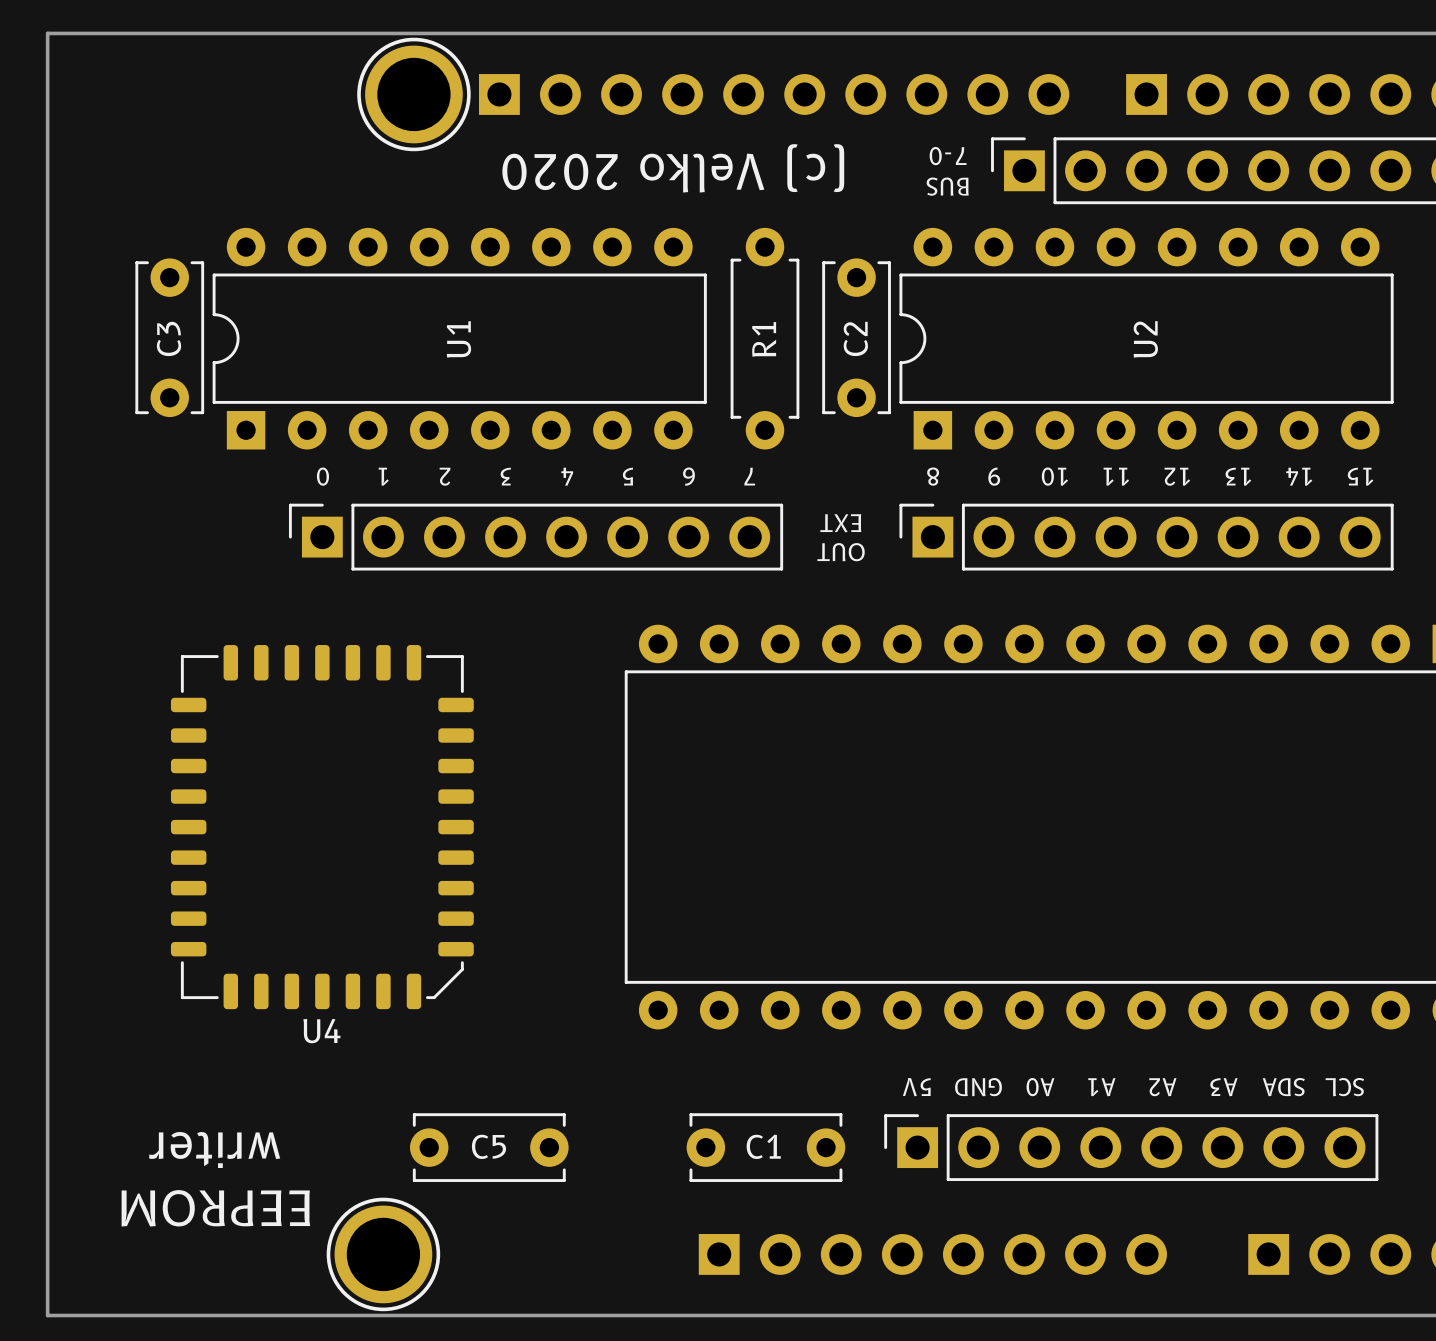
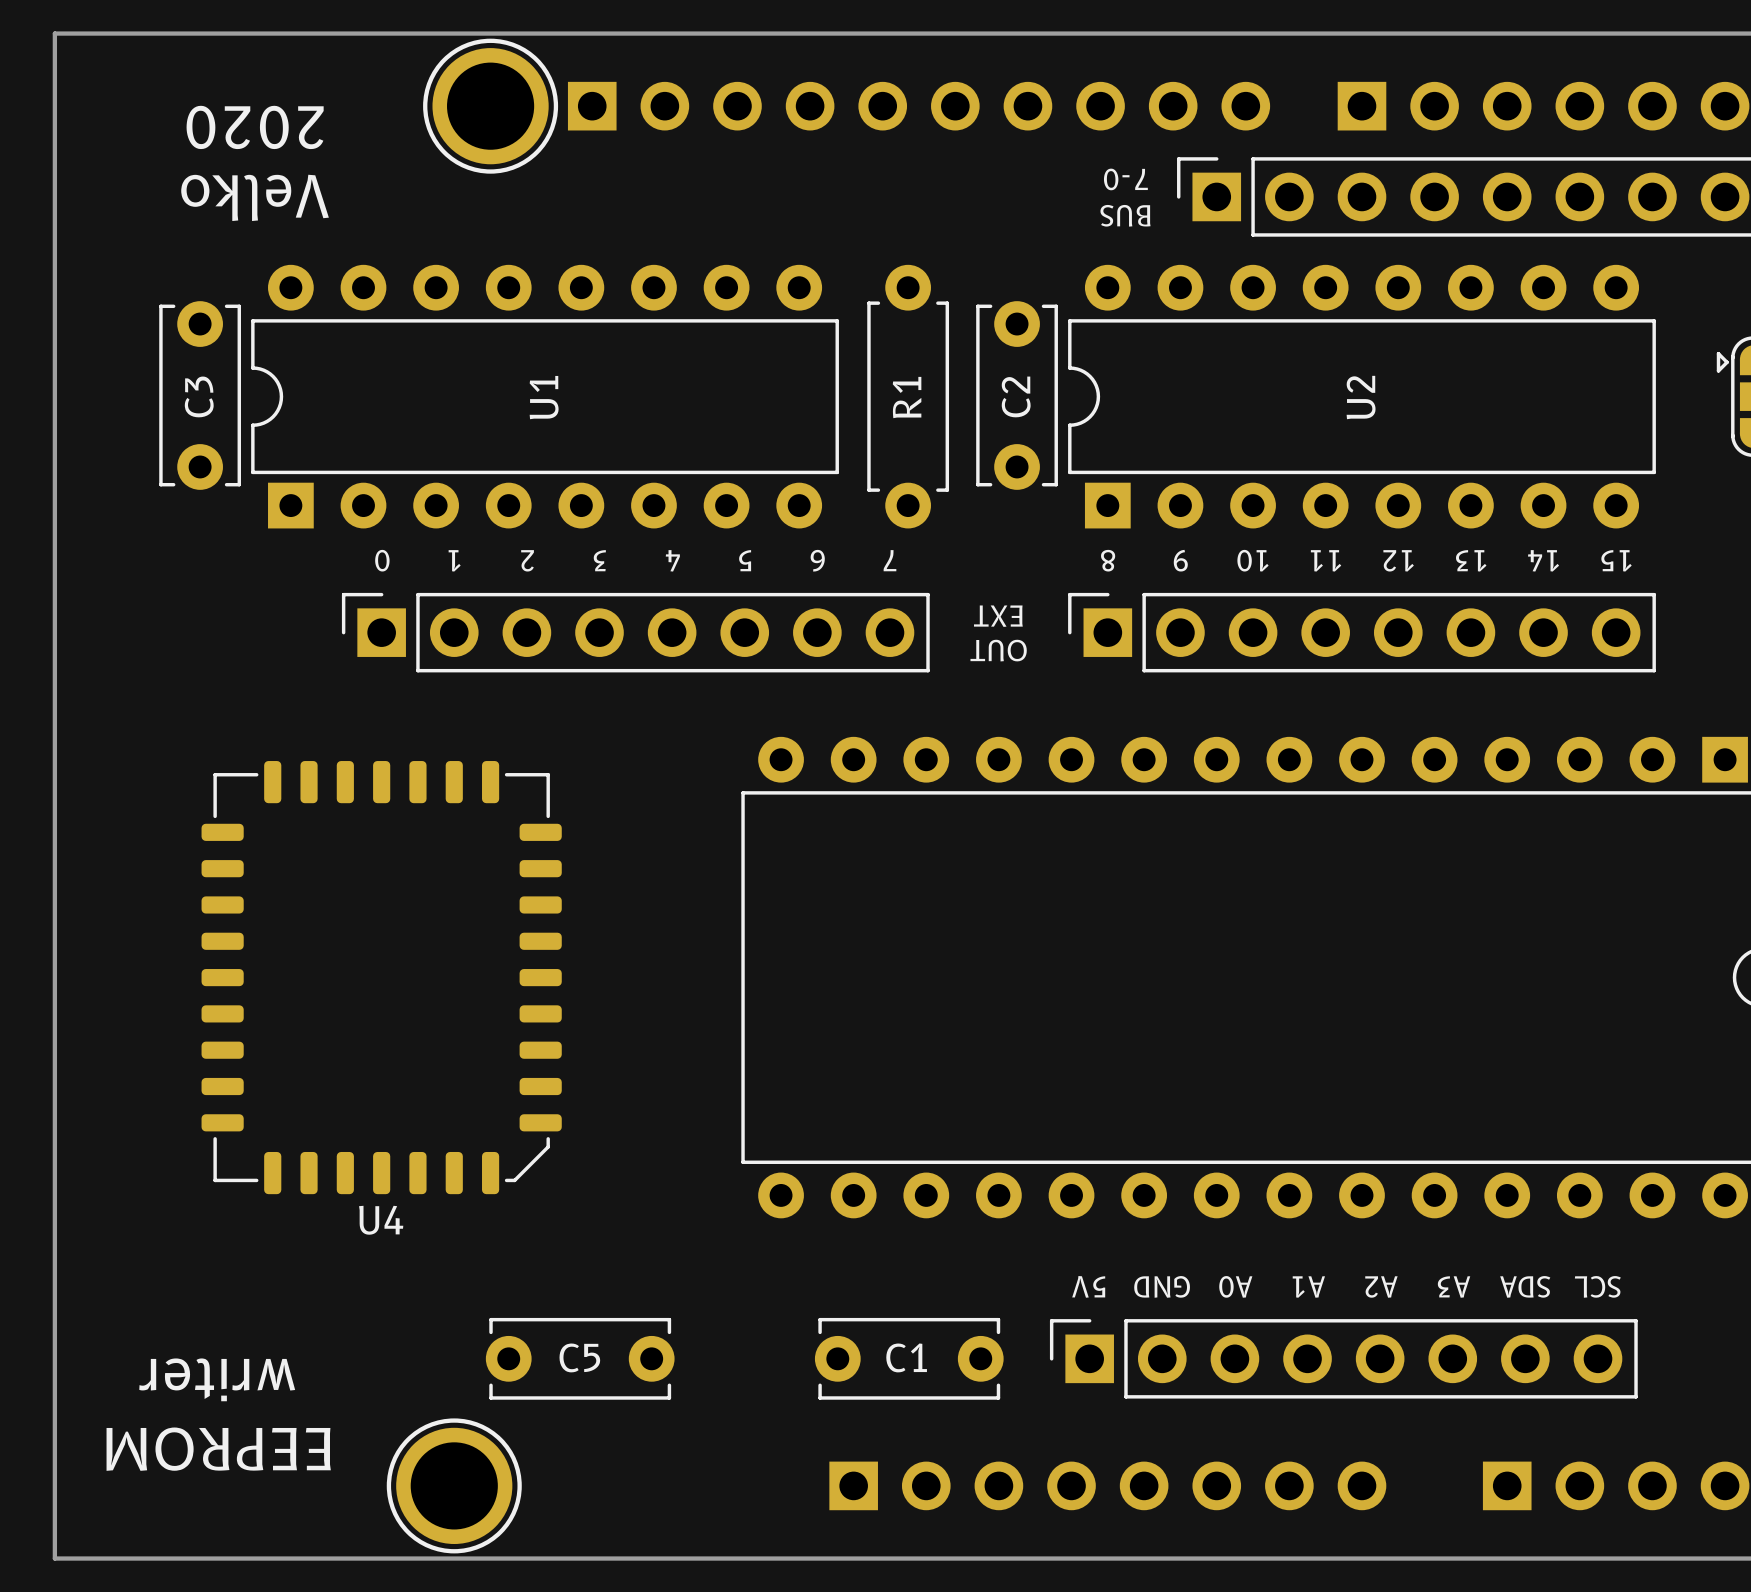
text: none -> 2020 (255, 127)
text: (c) Velko 2020 (673, 168) -> none
text: none -> Velko (255, 197)
text position: writer (214, 1150) -> writer (217, 1379)
text position: EEPROM (215, 1208) -> EEPROM (218, 1449)

